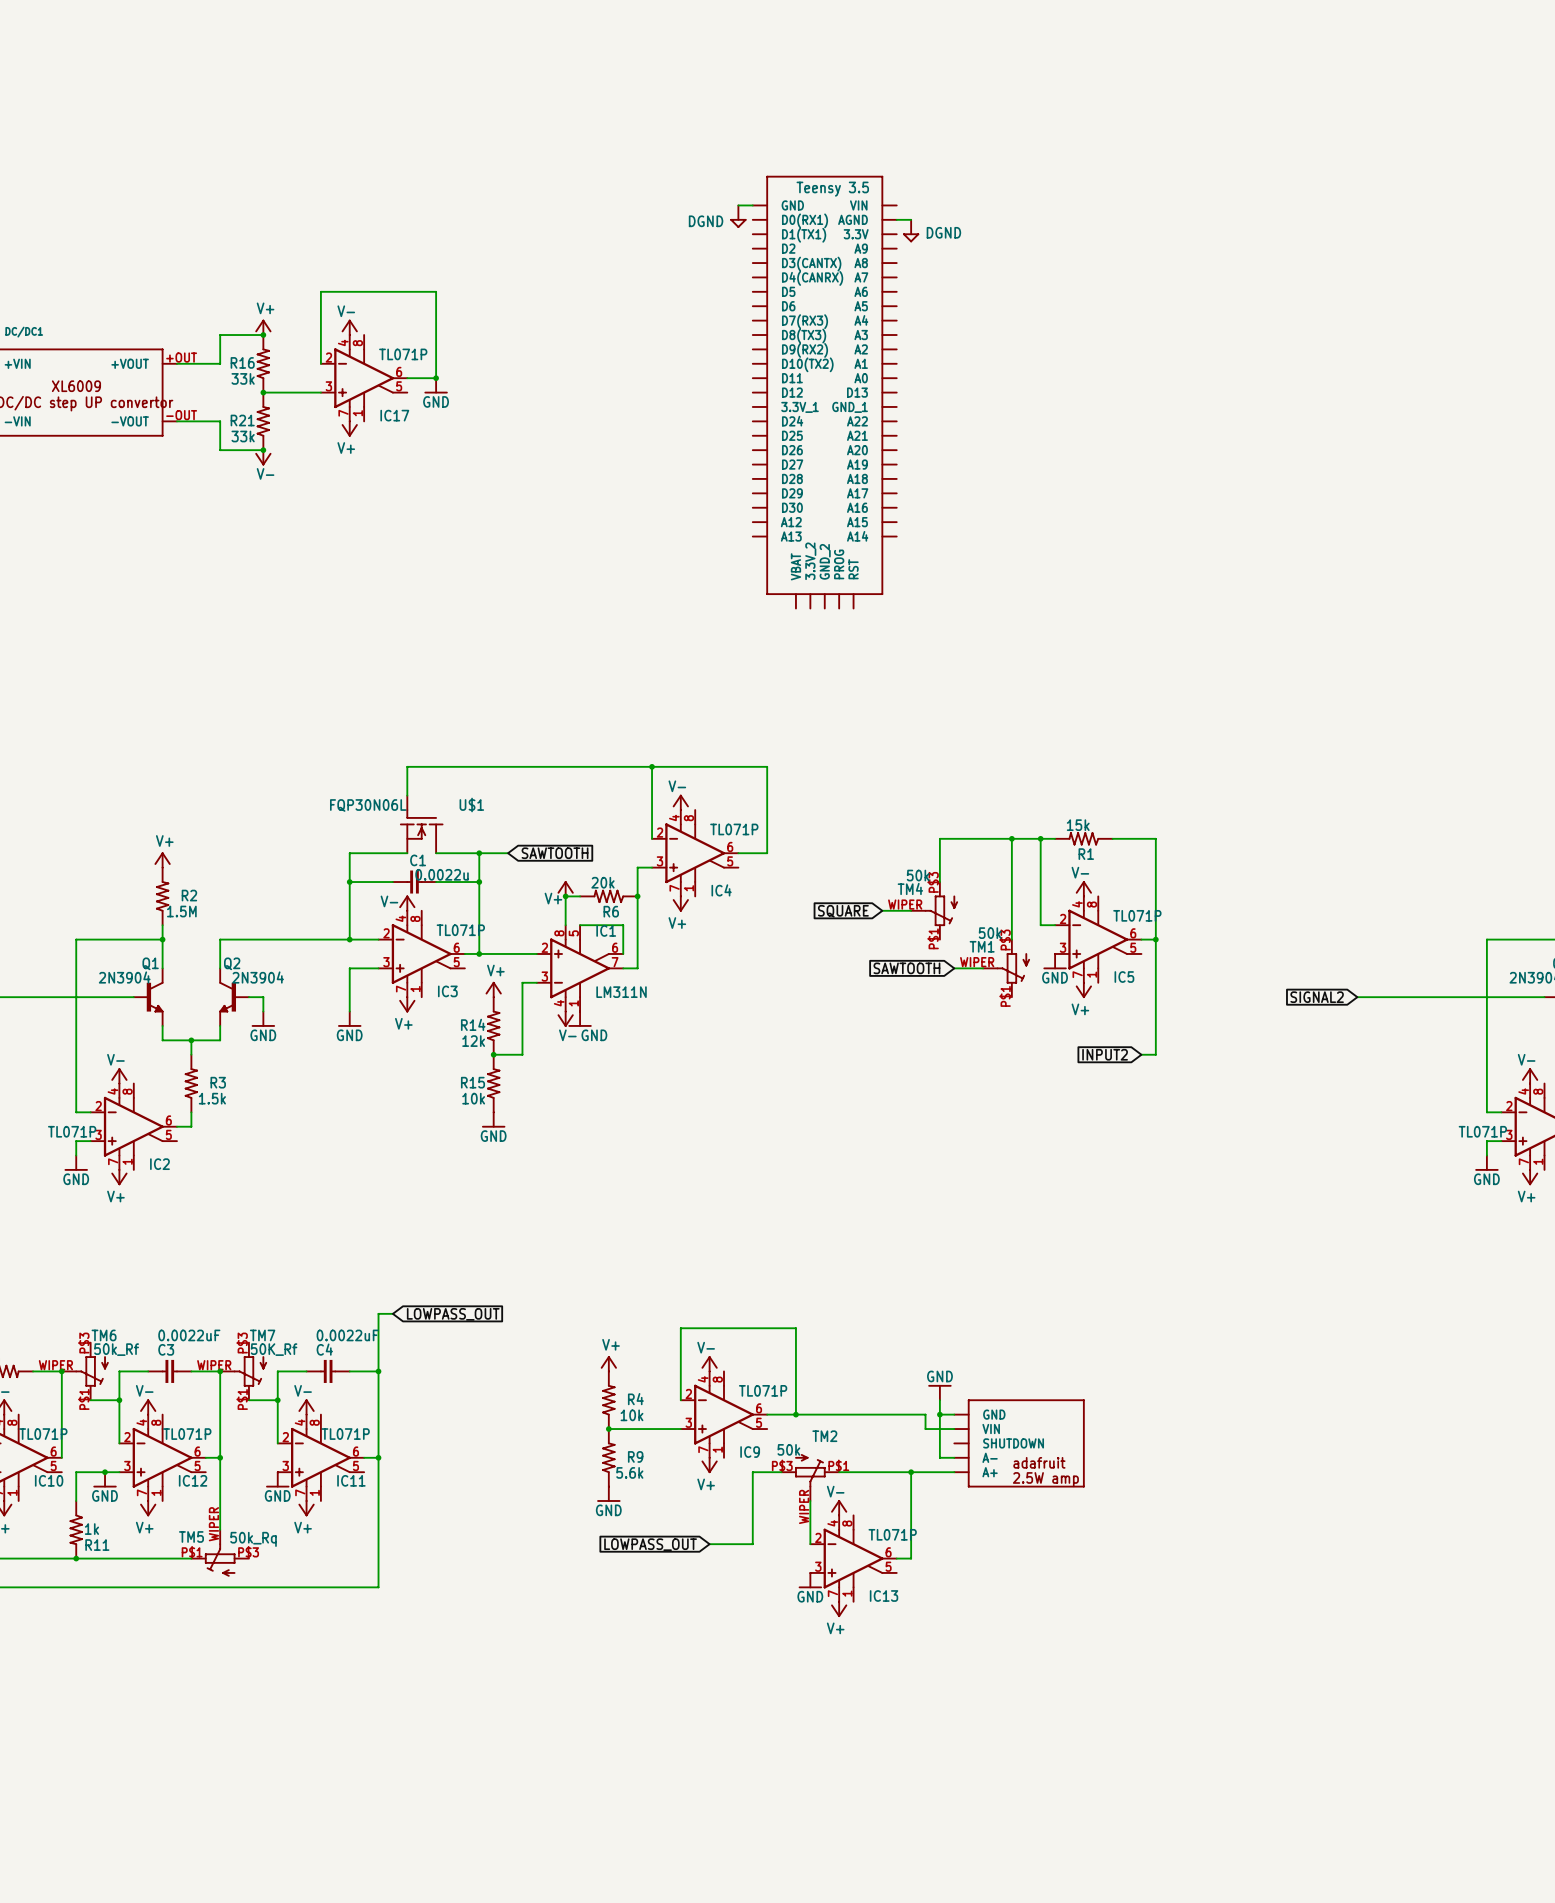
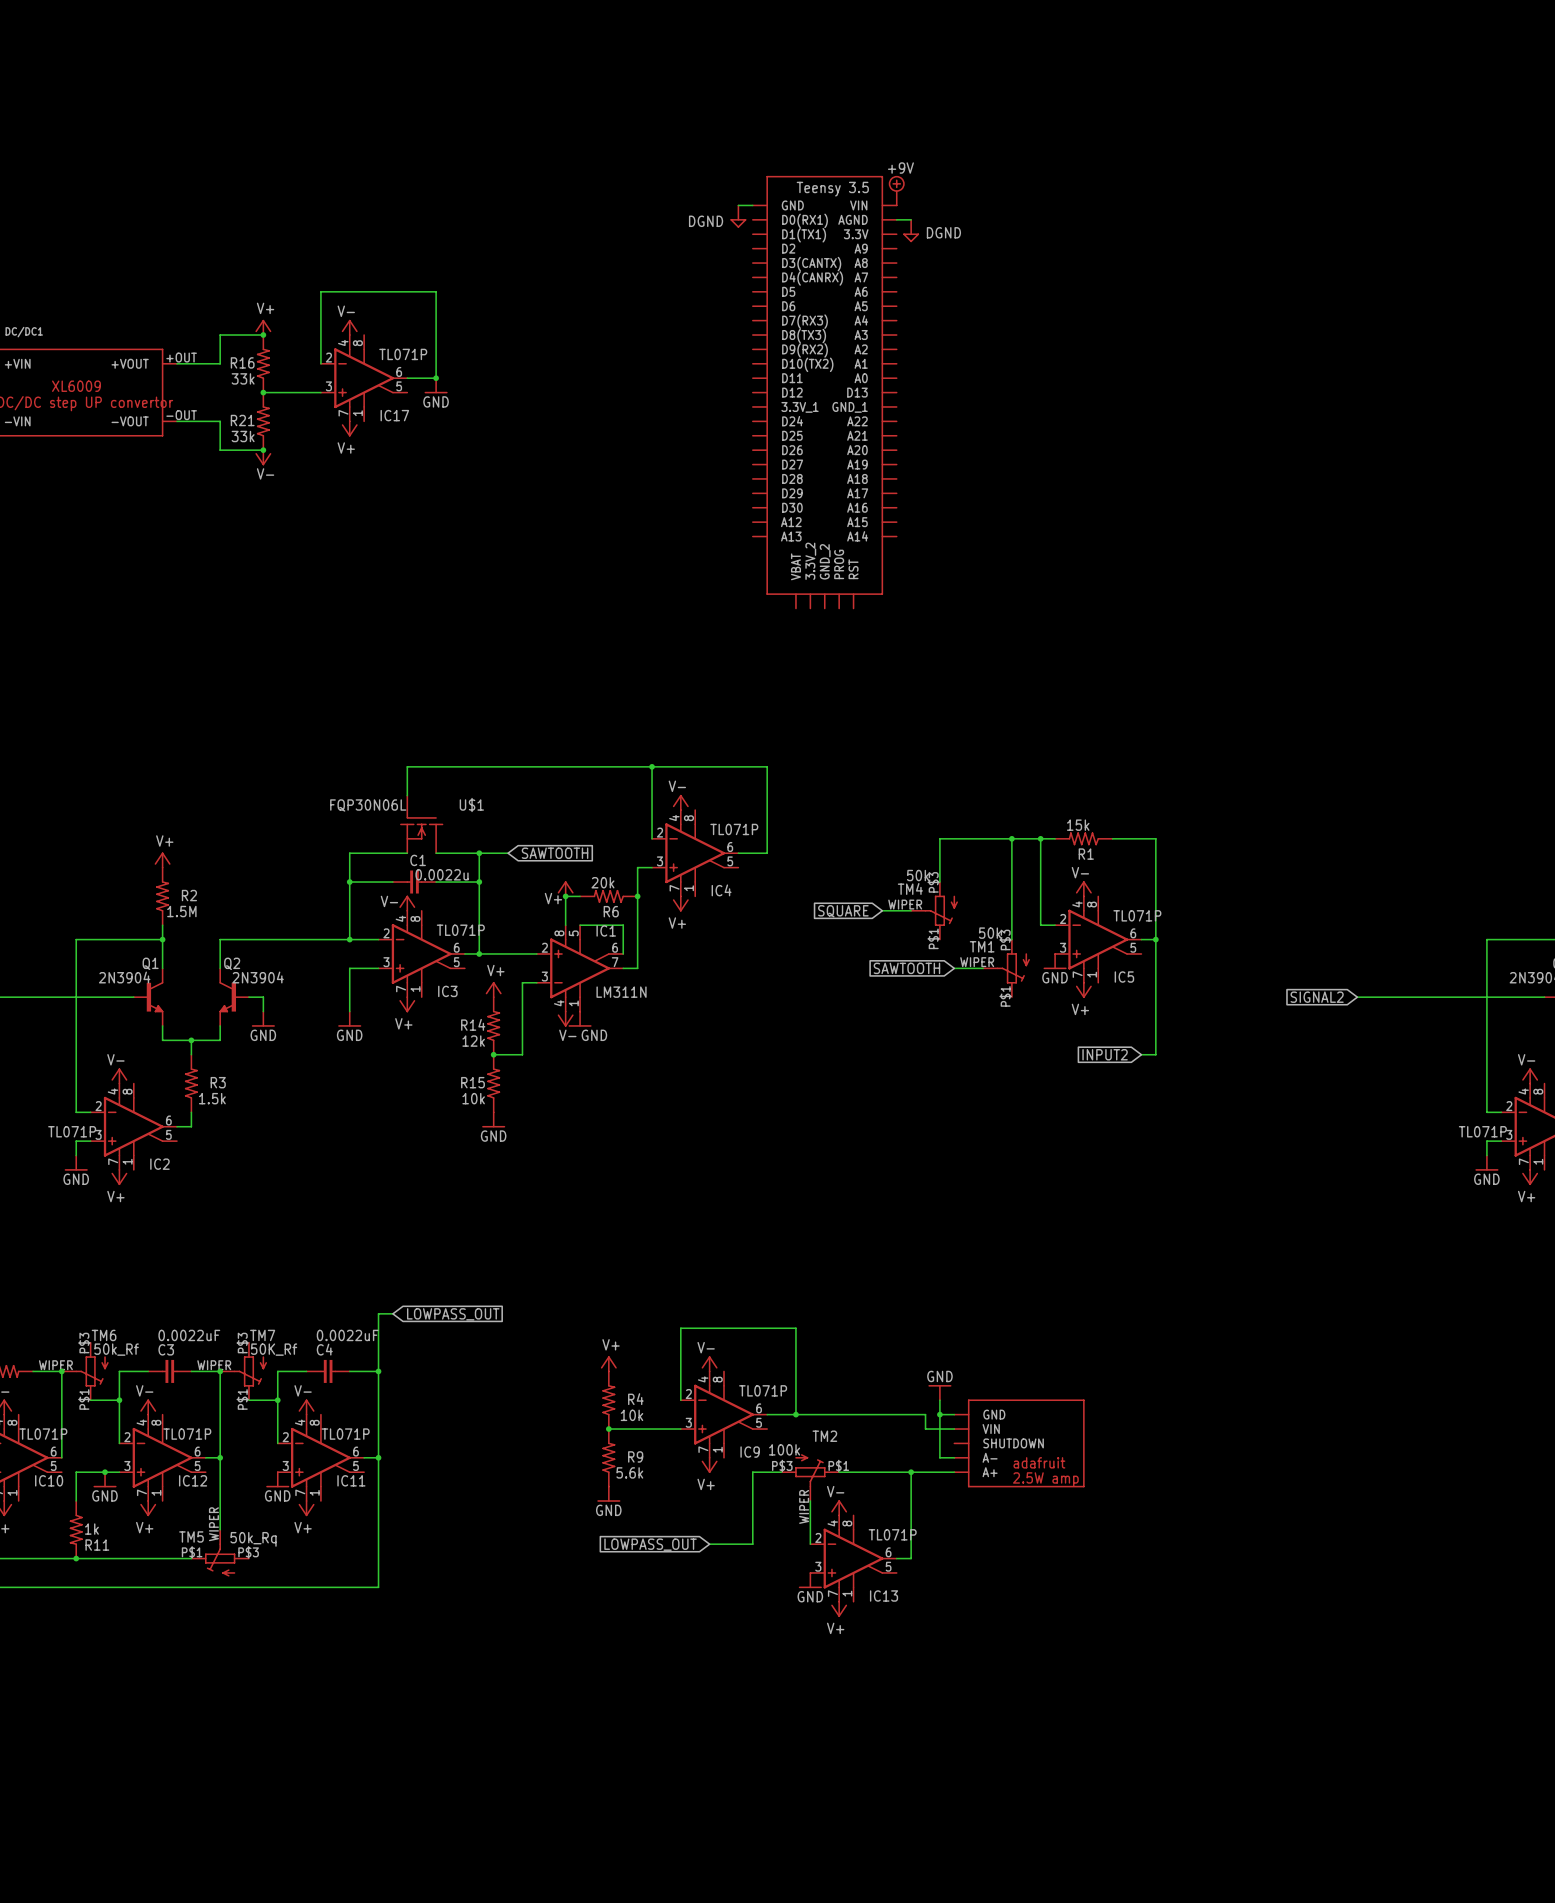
power symbol: none -> +9V (896, 190)
TM2 value: 50k (788, 1449) -> 100k (784, 1449)

